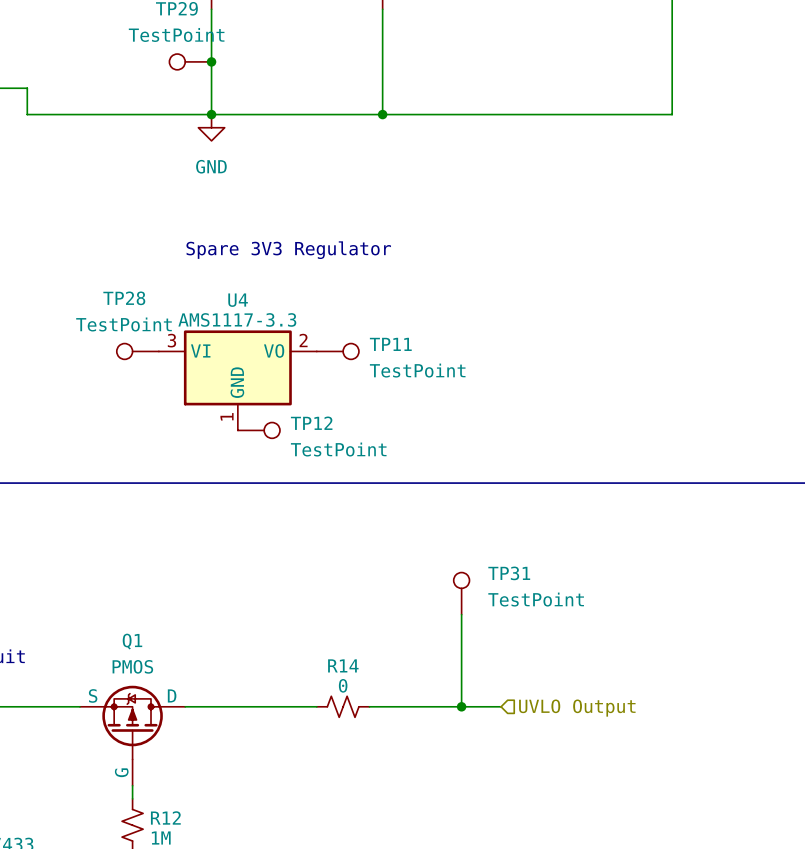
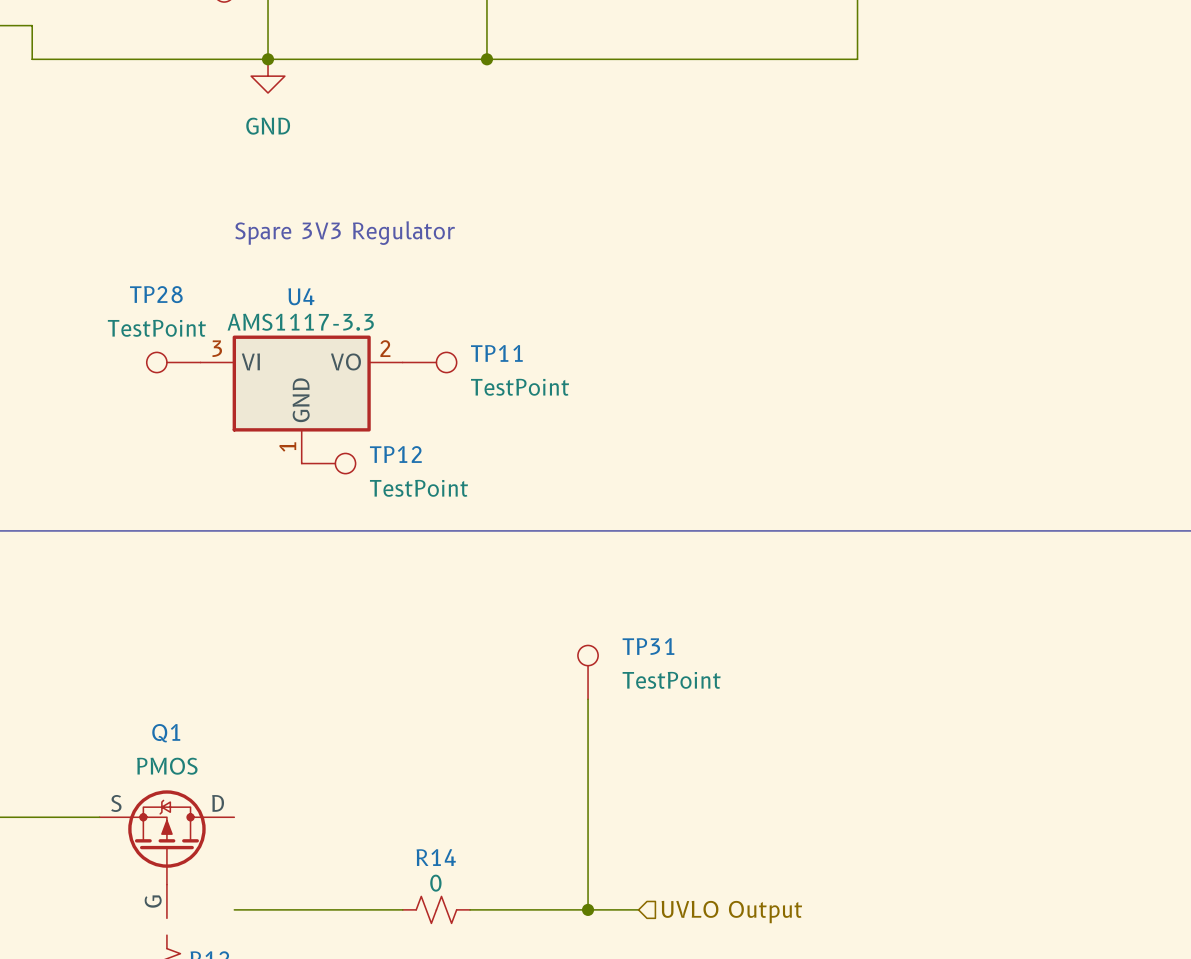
wire: (185, 706) (316, 706) -> (234, 909) (402, 909)
R14 position: (343, 706) -> (436, 909)
wire: (369, 706) (501, 706) -> (470, 909) (638, 909)
wire: none -> (588, 817) (588, 909)
junction: (461, 706) -> none
hierarchical label position: UVLO Output (577, 708) -> UVLO Output (731, 912)
junction: none -> (588, 909)
wire: (132, 785) (132, 798) -> none

